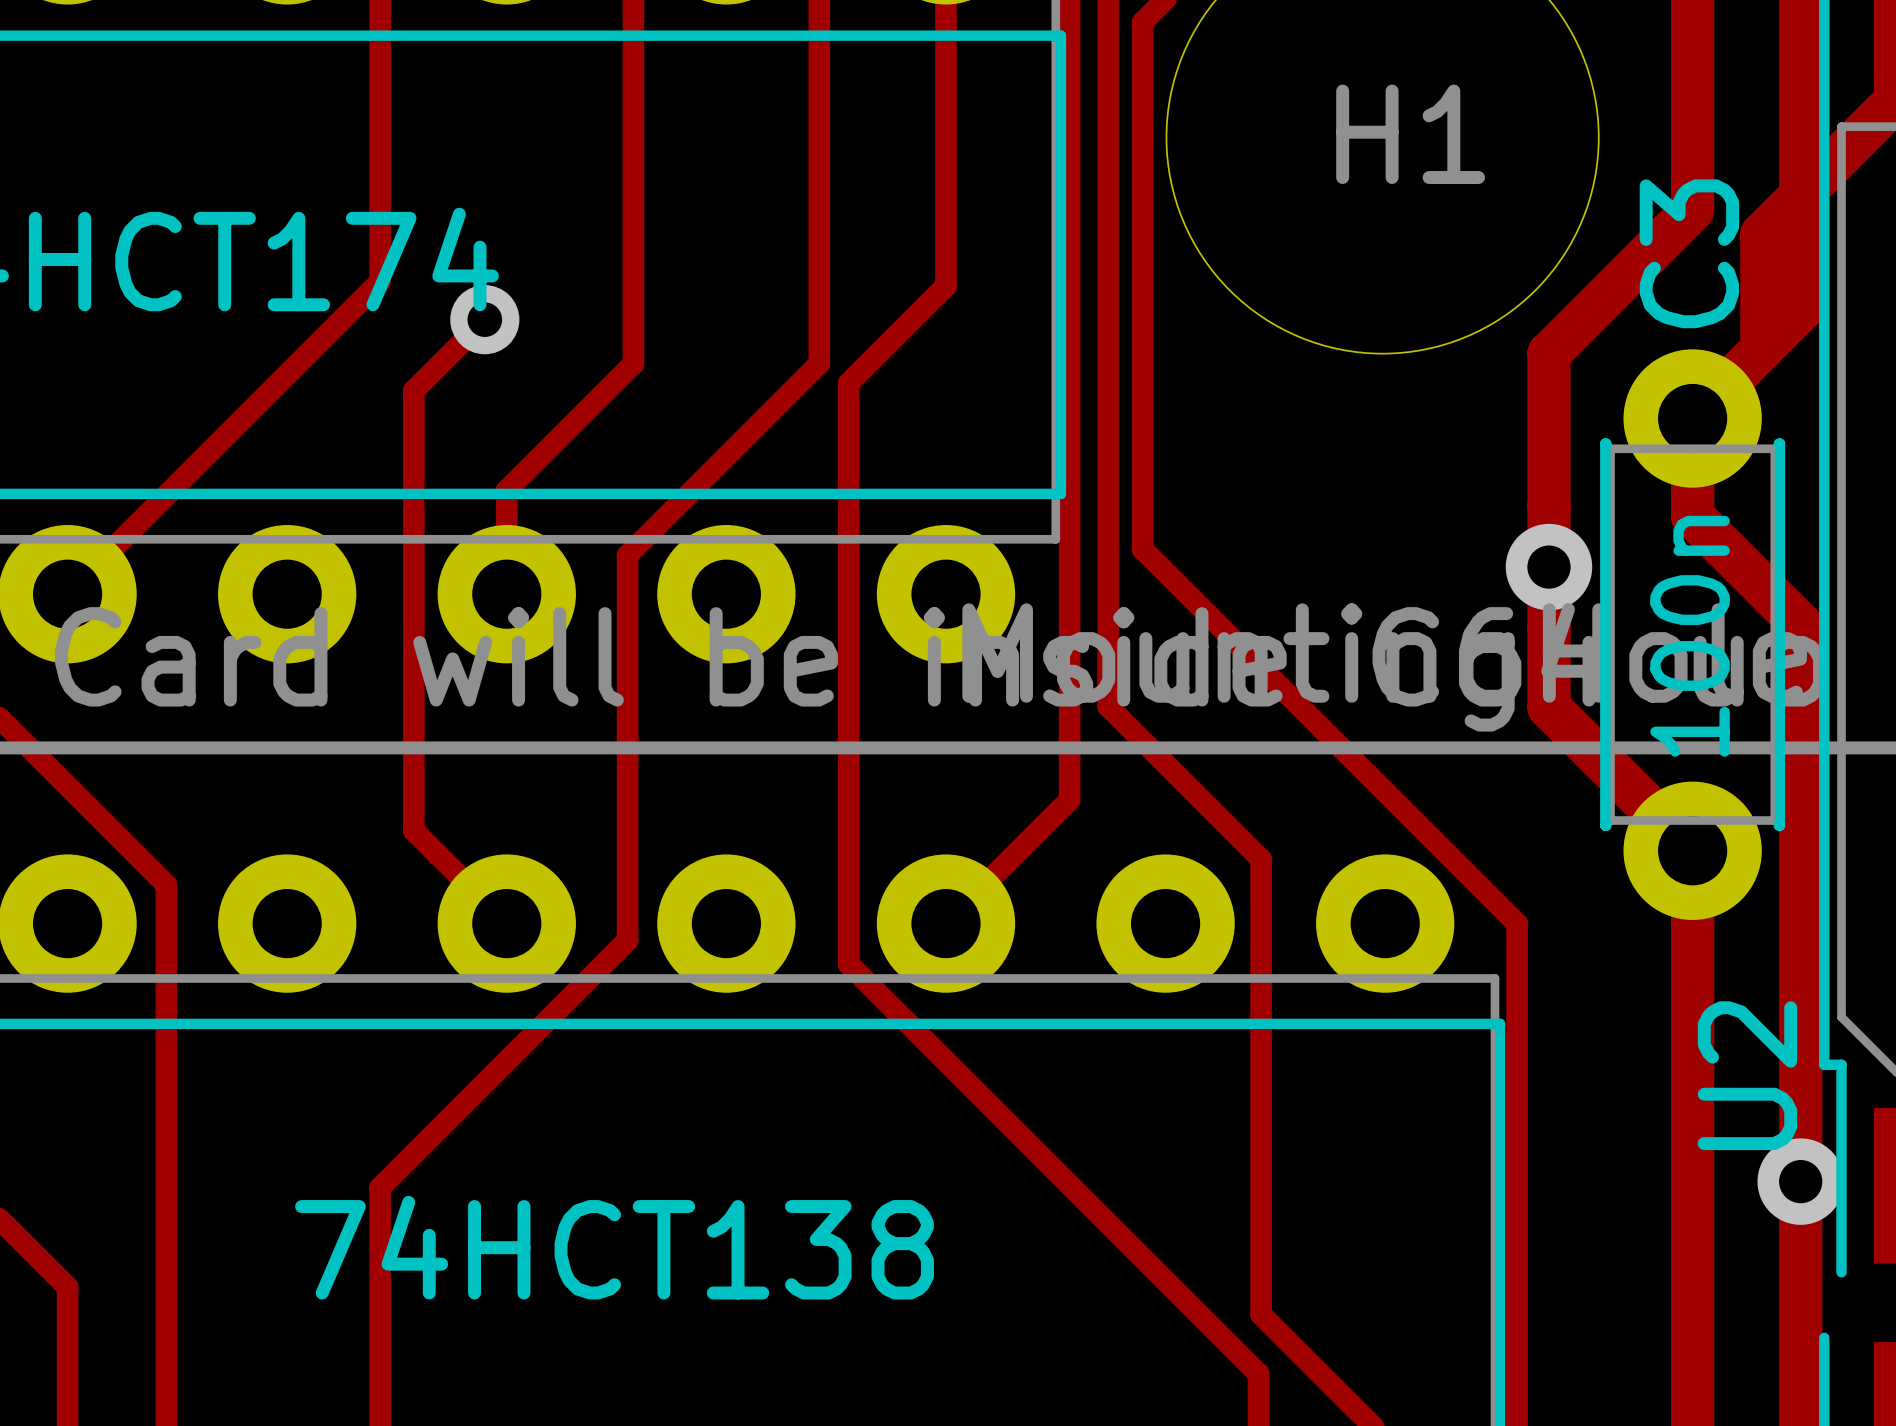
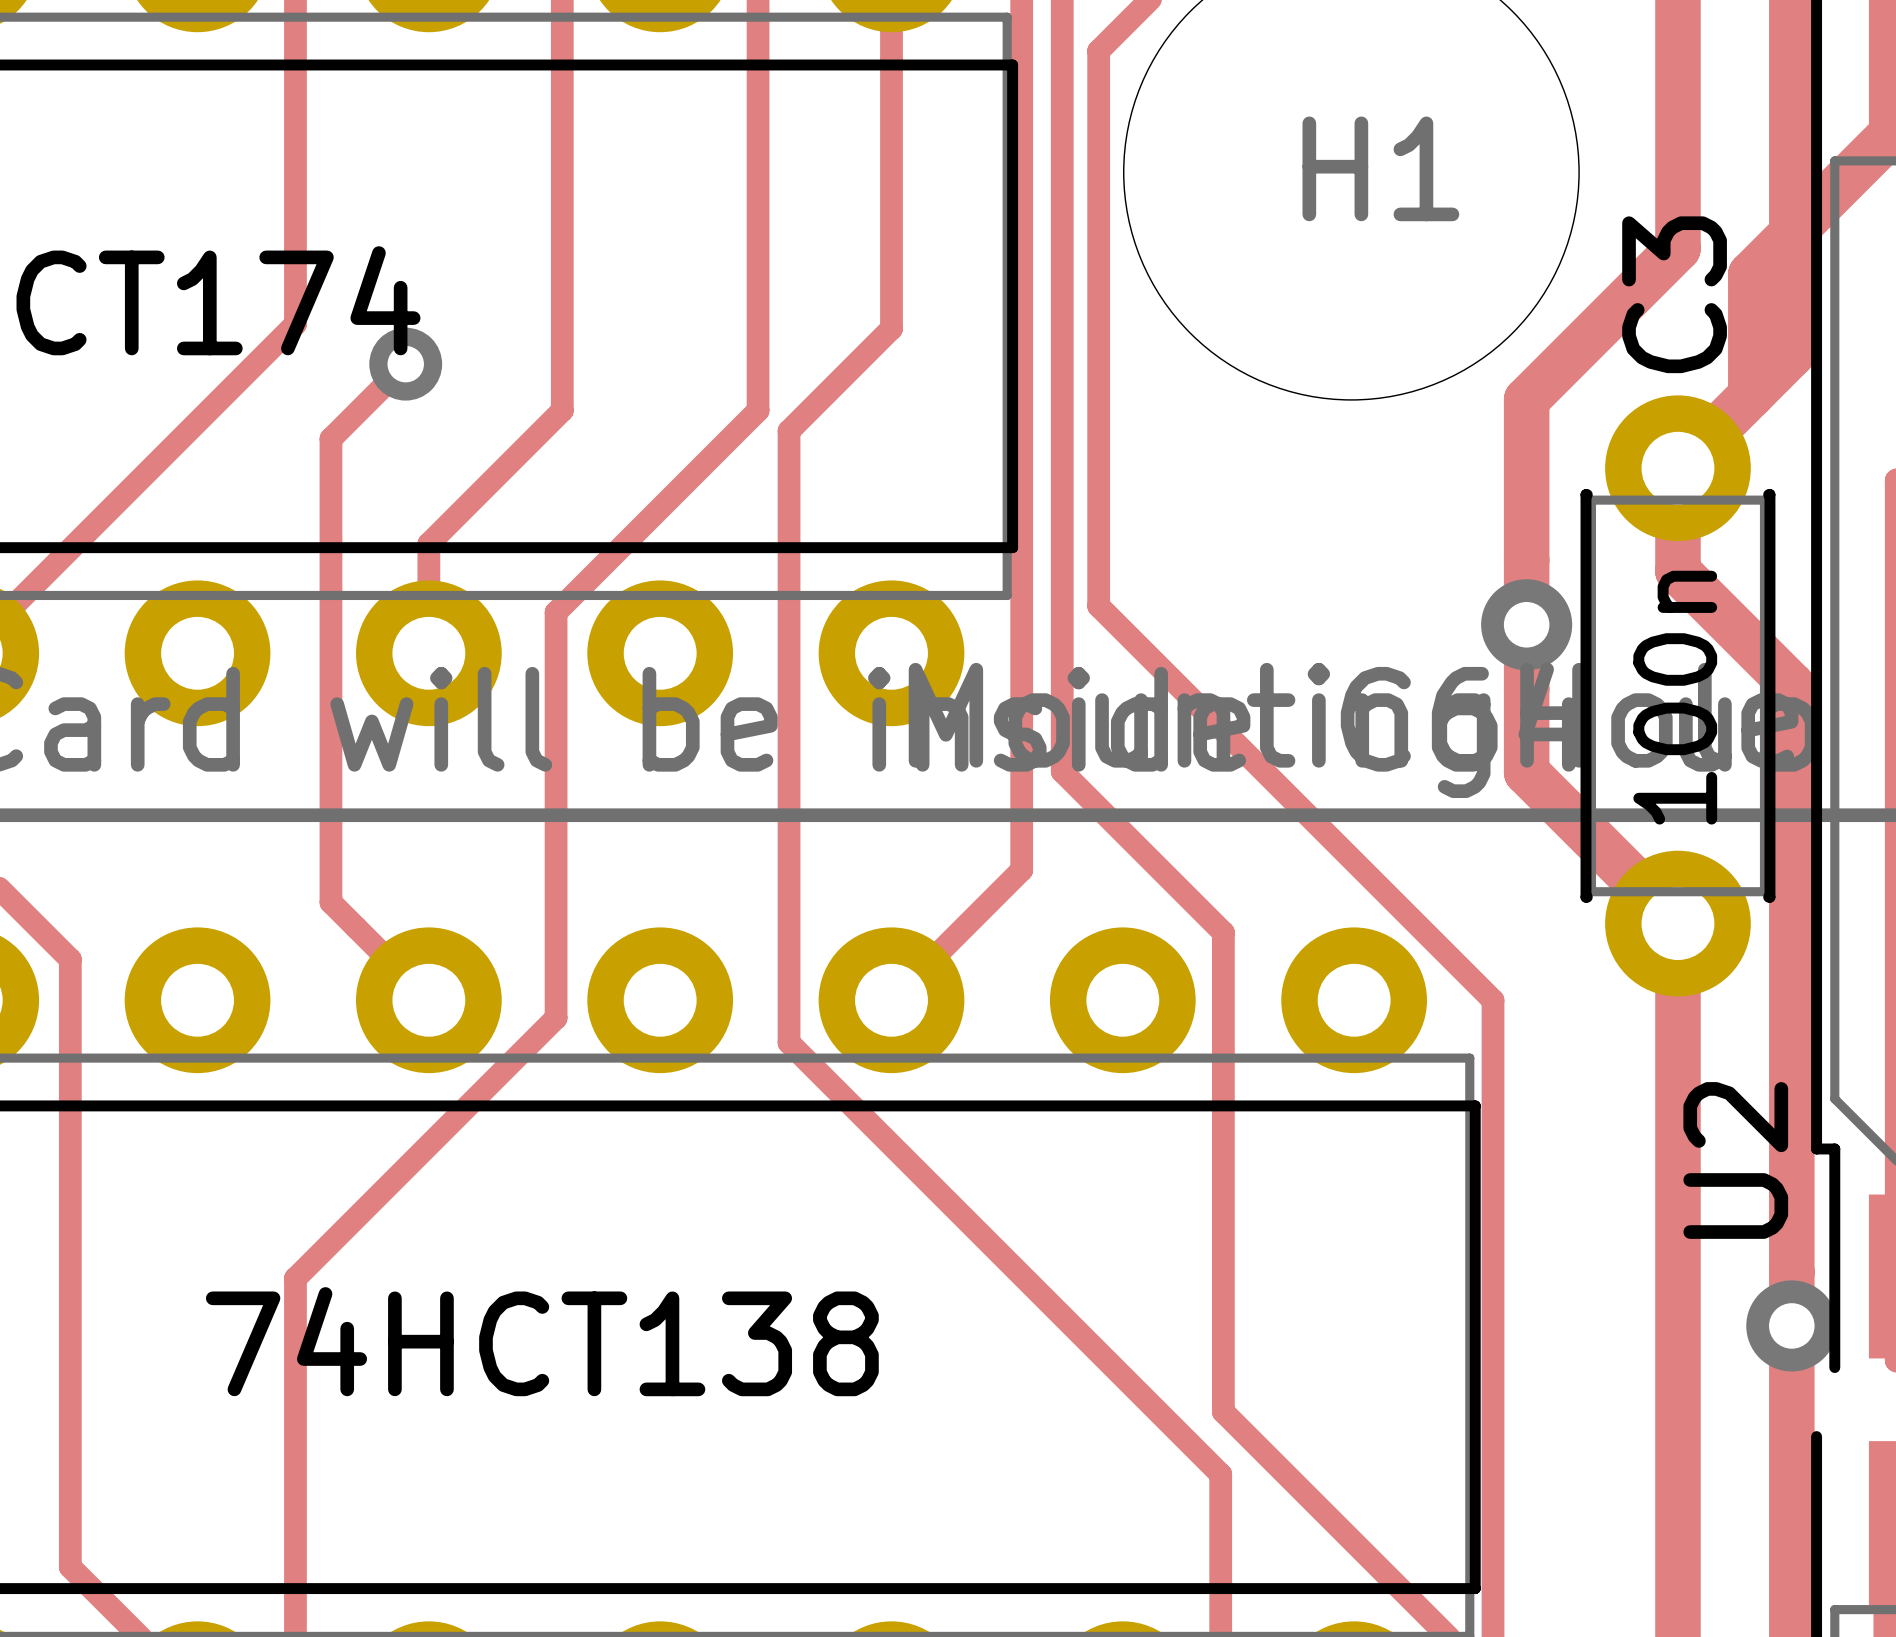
via position: (1800, 1181) -> (1791, 1325)

